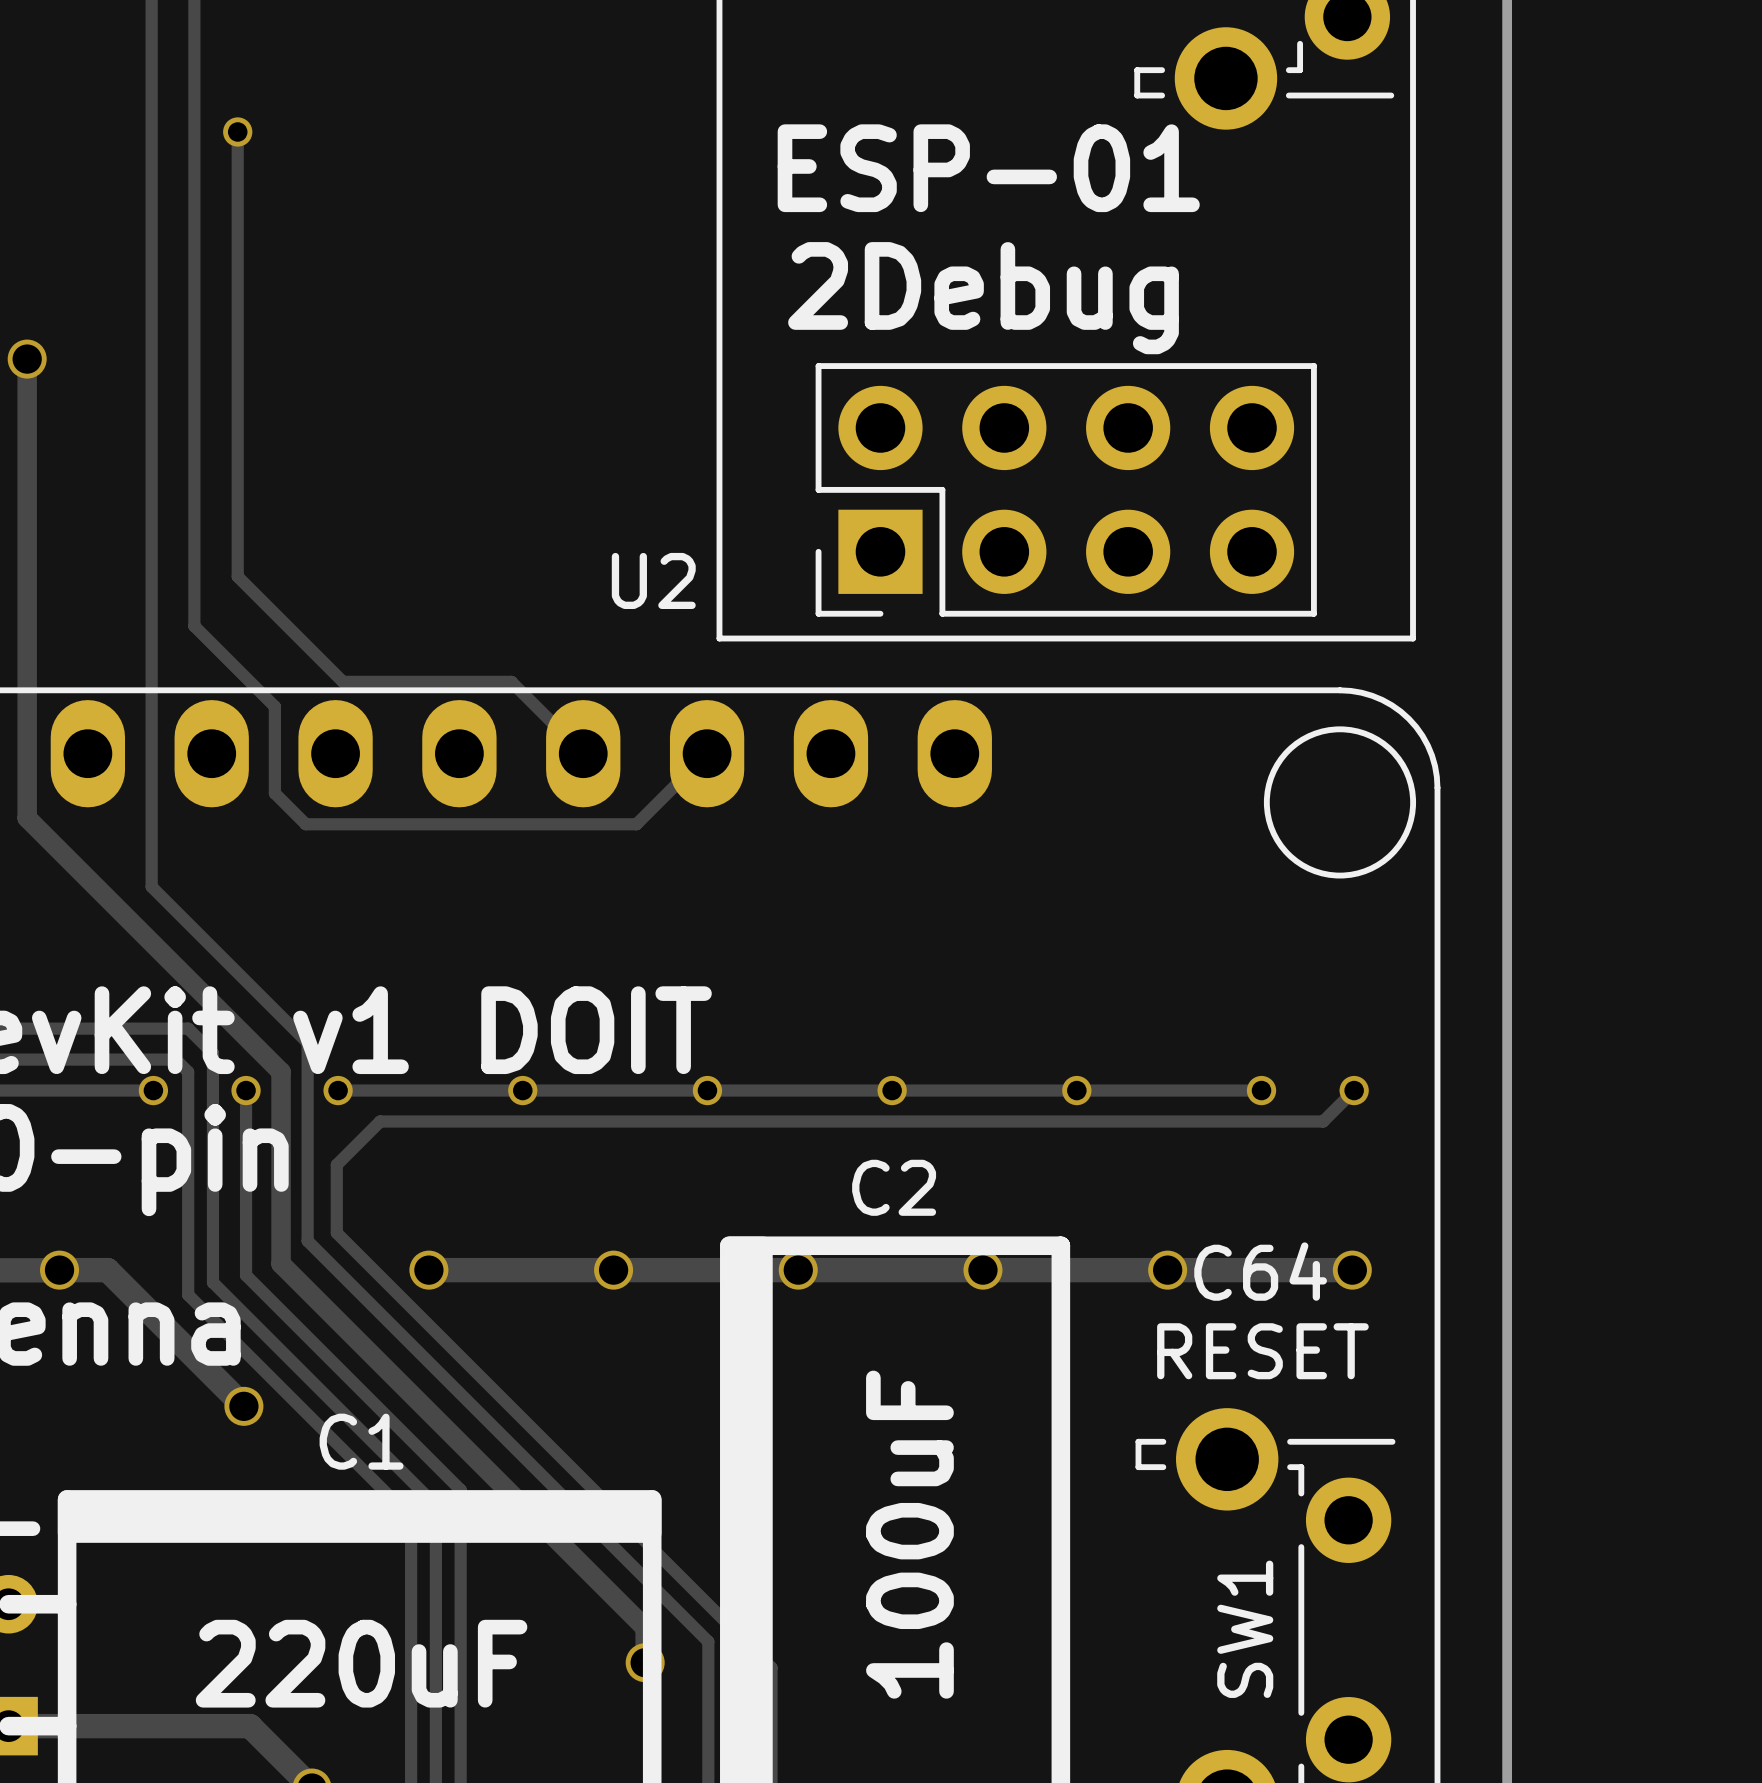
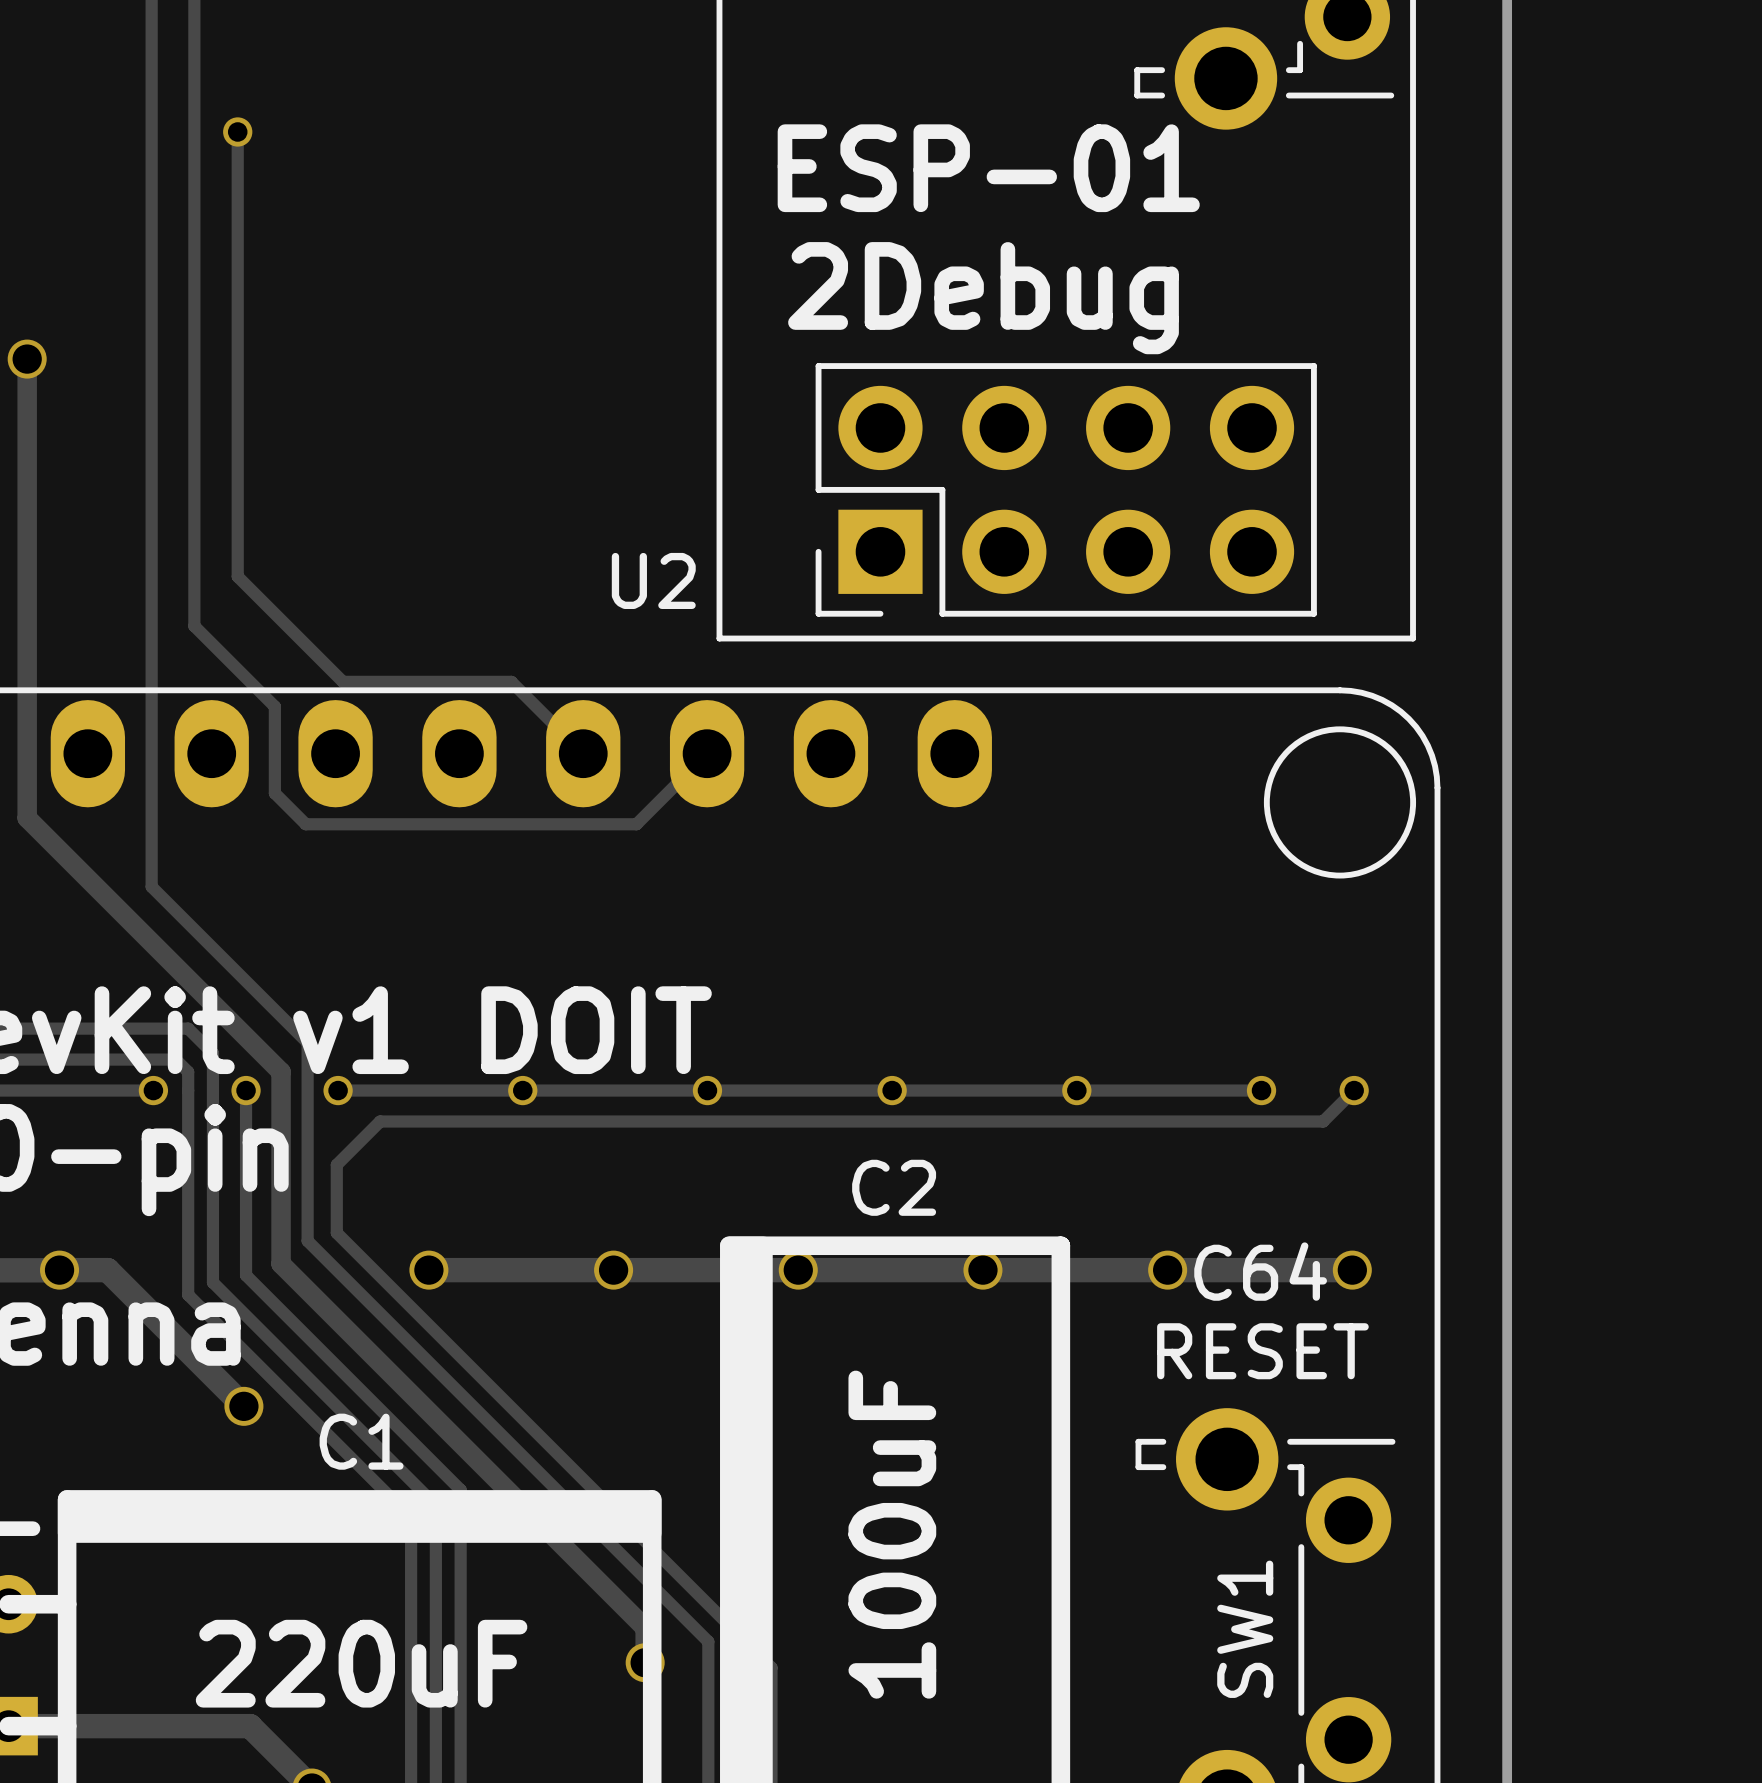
C2 value position: 100uF (909, 1534) -> 100uF (892, 1534)

